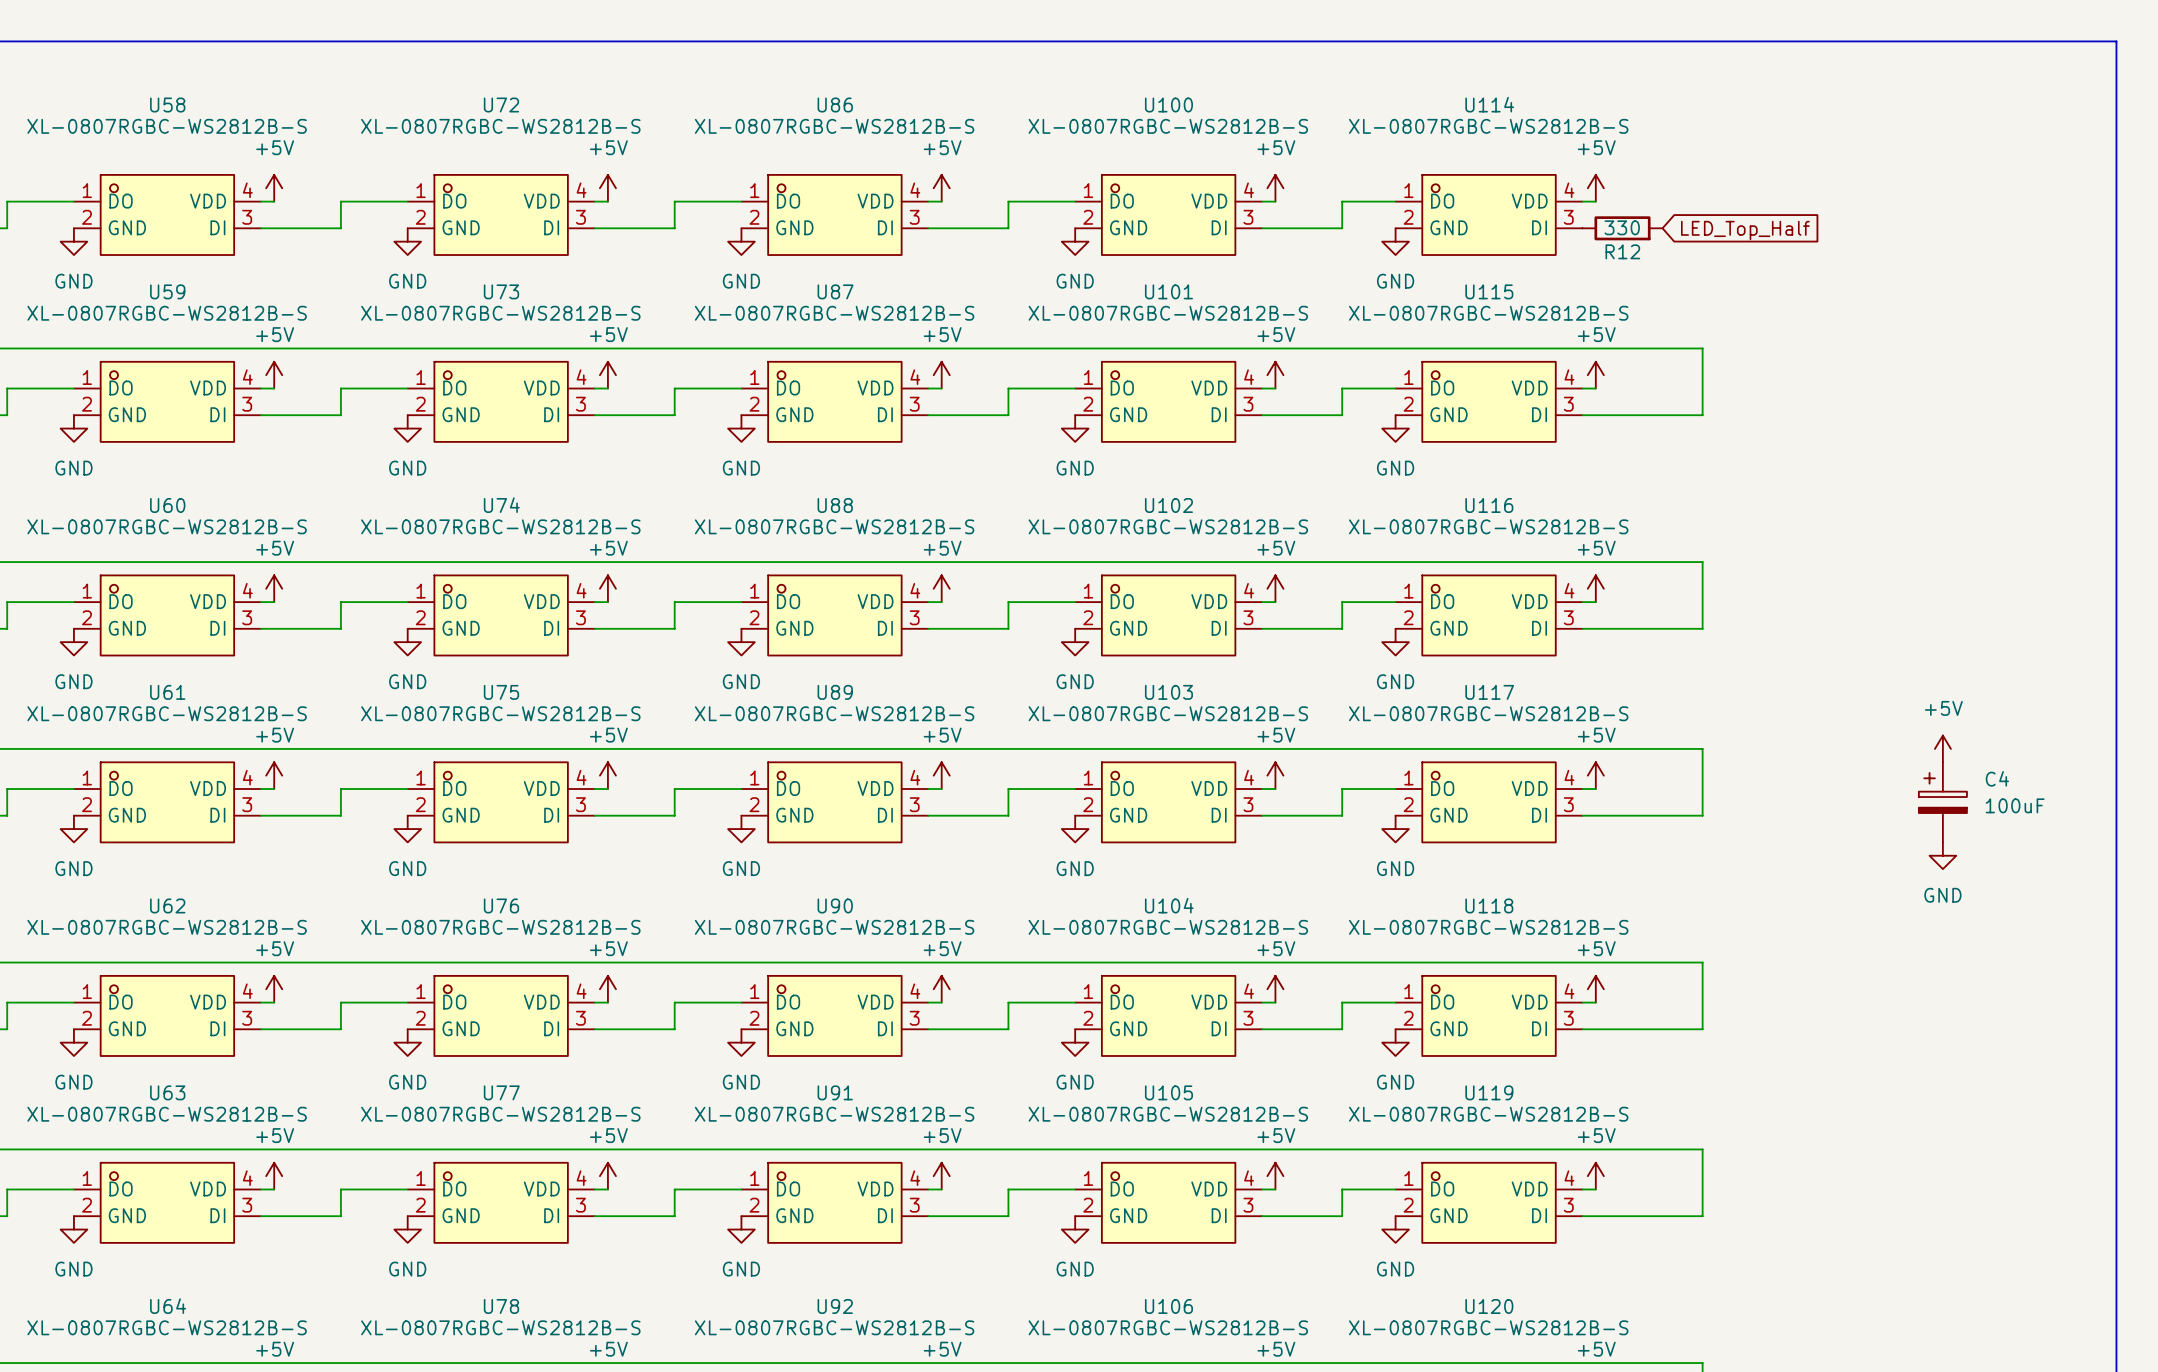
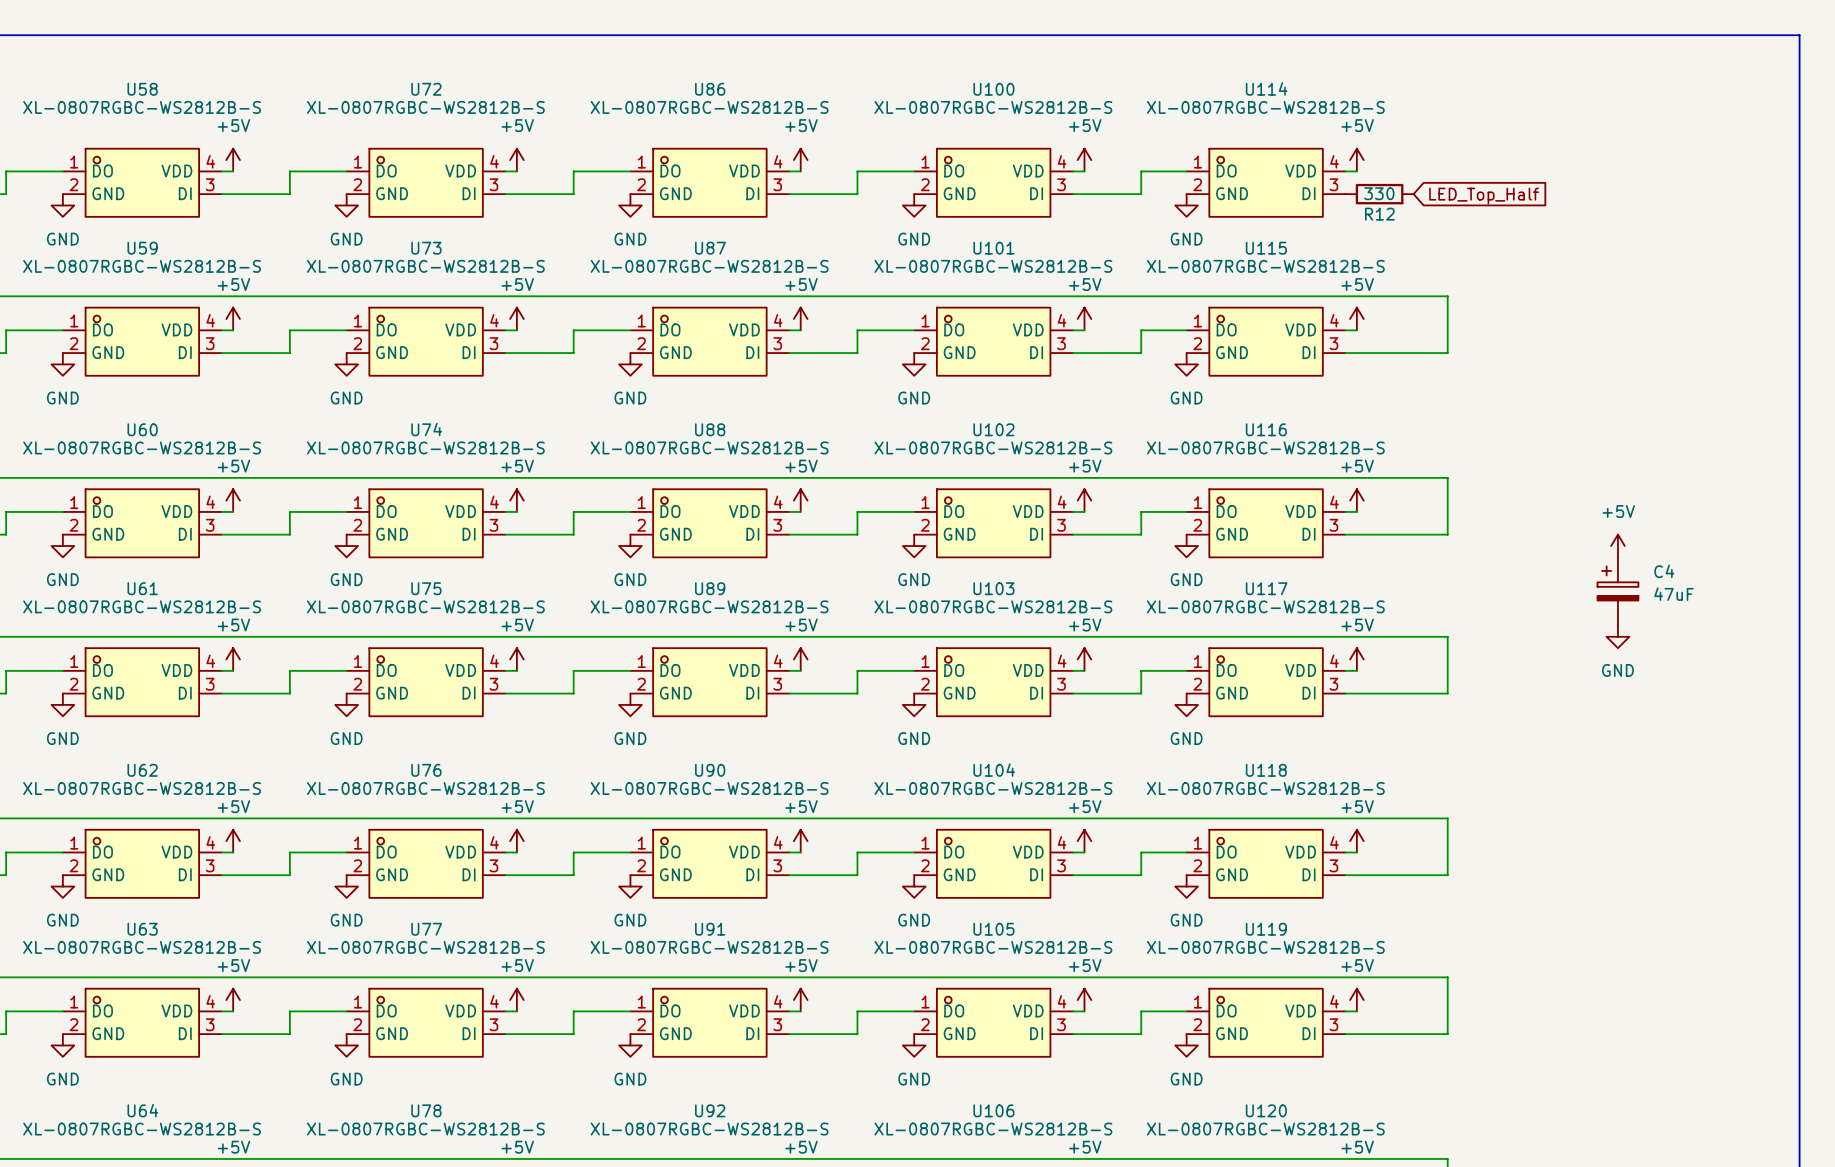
power symbol position: +5V (1942, 748) -> +5V (1617, 546)
C4 position: (1942, 802) -> (1617, 591)
C4 value: 100uF (2015, 805) -> 47uF (1674, 594)
power symbol position: GND (1942, 855) -> GND (1617, 636)

